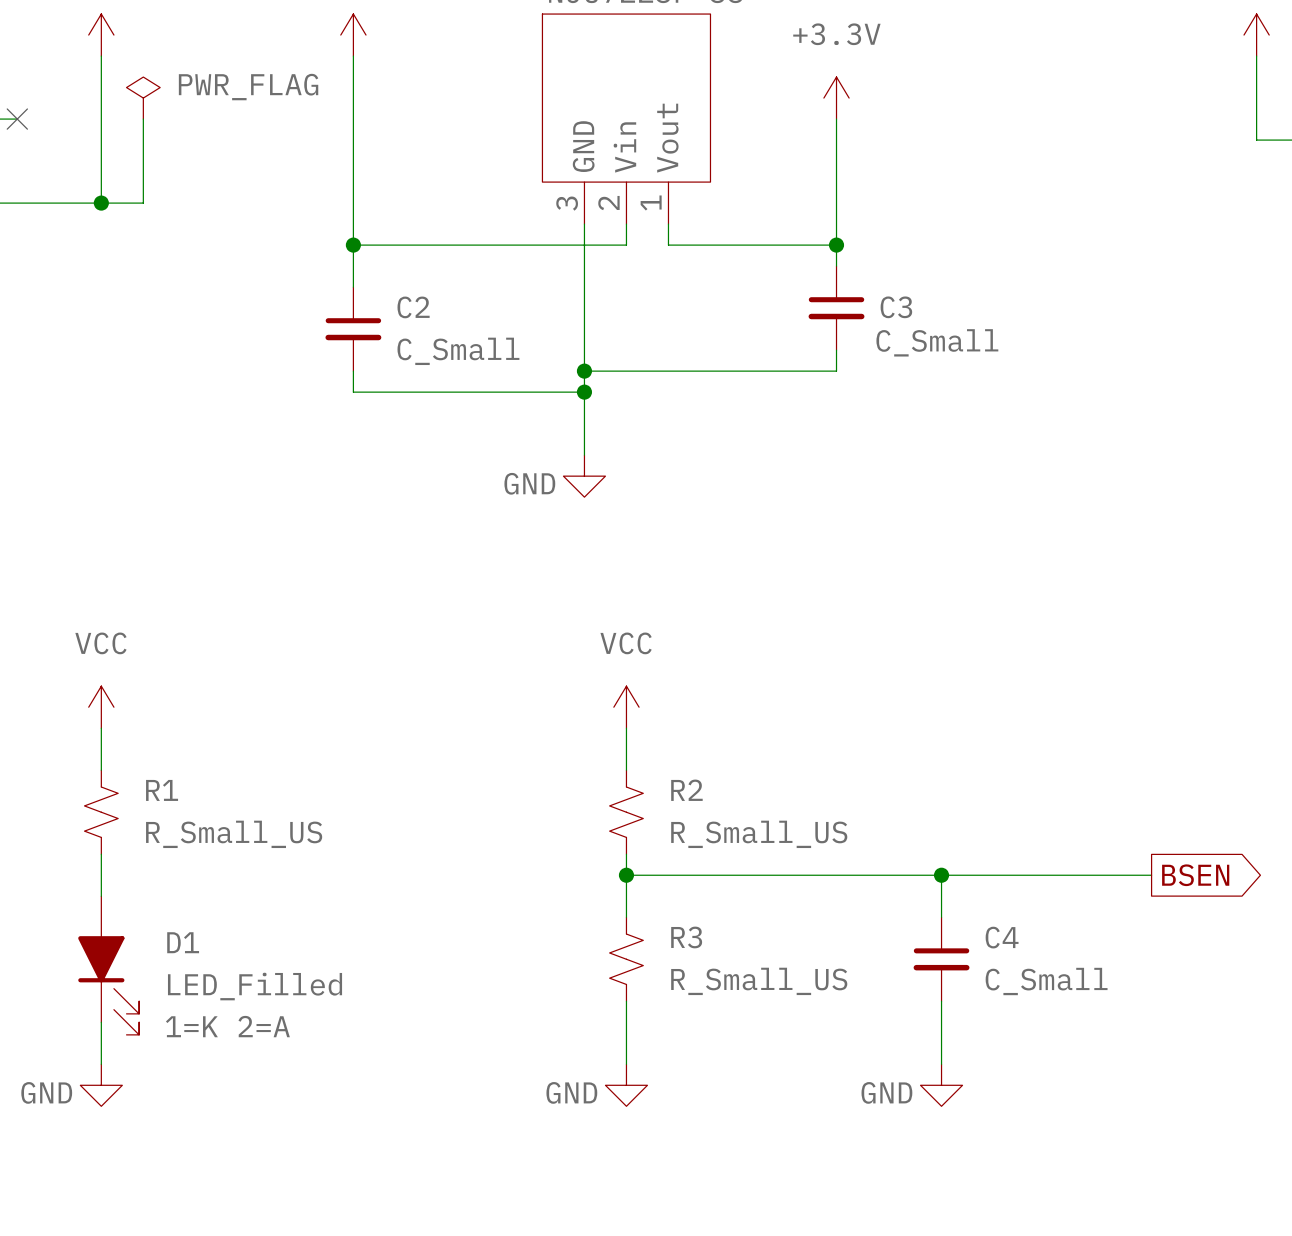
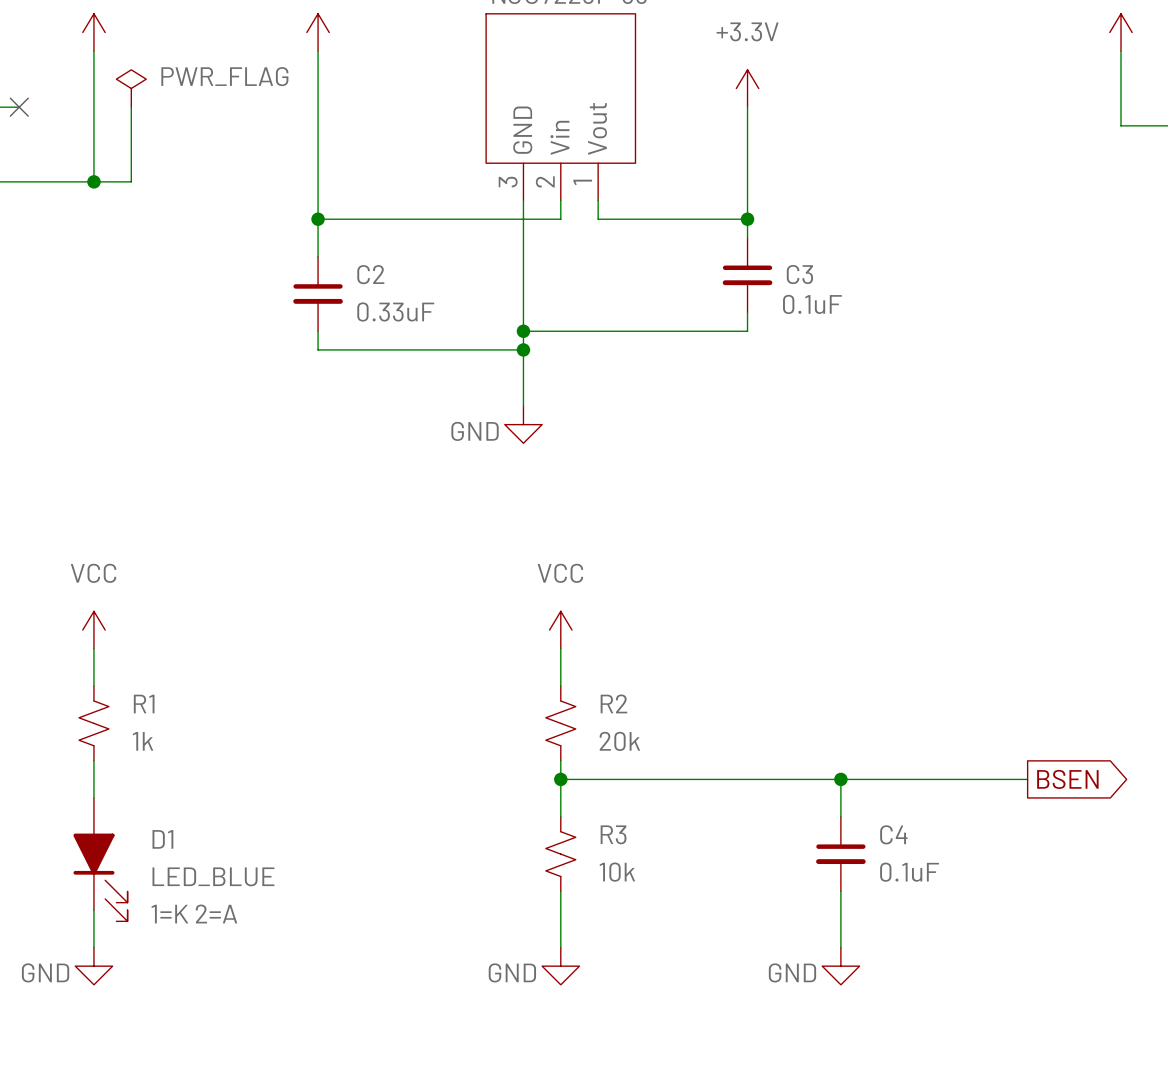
C3 value: C_Small (937, 342) -> 0.1uF (812, 304)
C2 value: C_Small (458, 351) -> 0.33uF (395, 311)
R1 value: R_Small_US (234, 834) -> 1k (143, 741)
R2 value: R_Small_US (759, 834) -> 20k (619, 741)
R3 value: R_Small_US (759, 981) -> 10k (617, 872)
C4 value: C_Small (1046, 981) -> 0.1uF (909, 872)
D1 value: LED_Filled (255, 986) -> LED_BLUE (213, 876)

